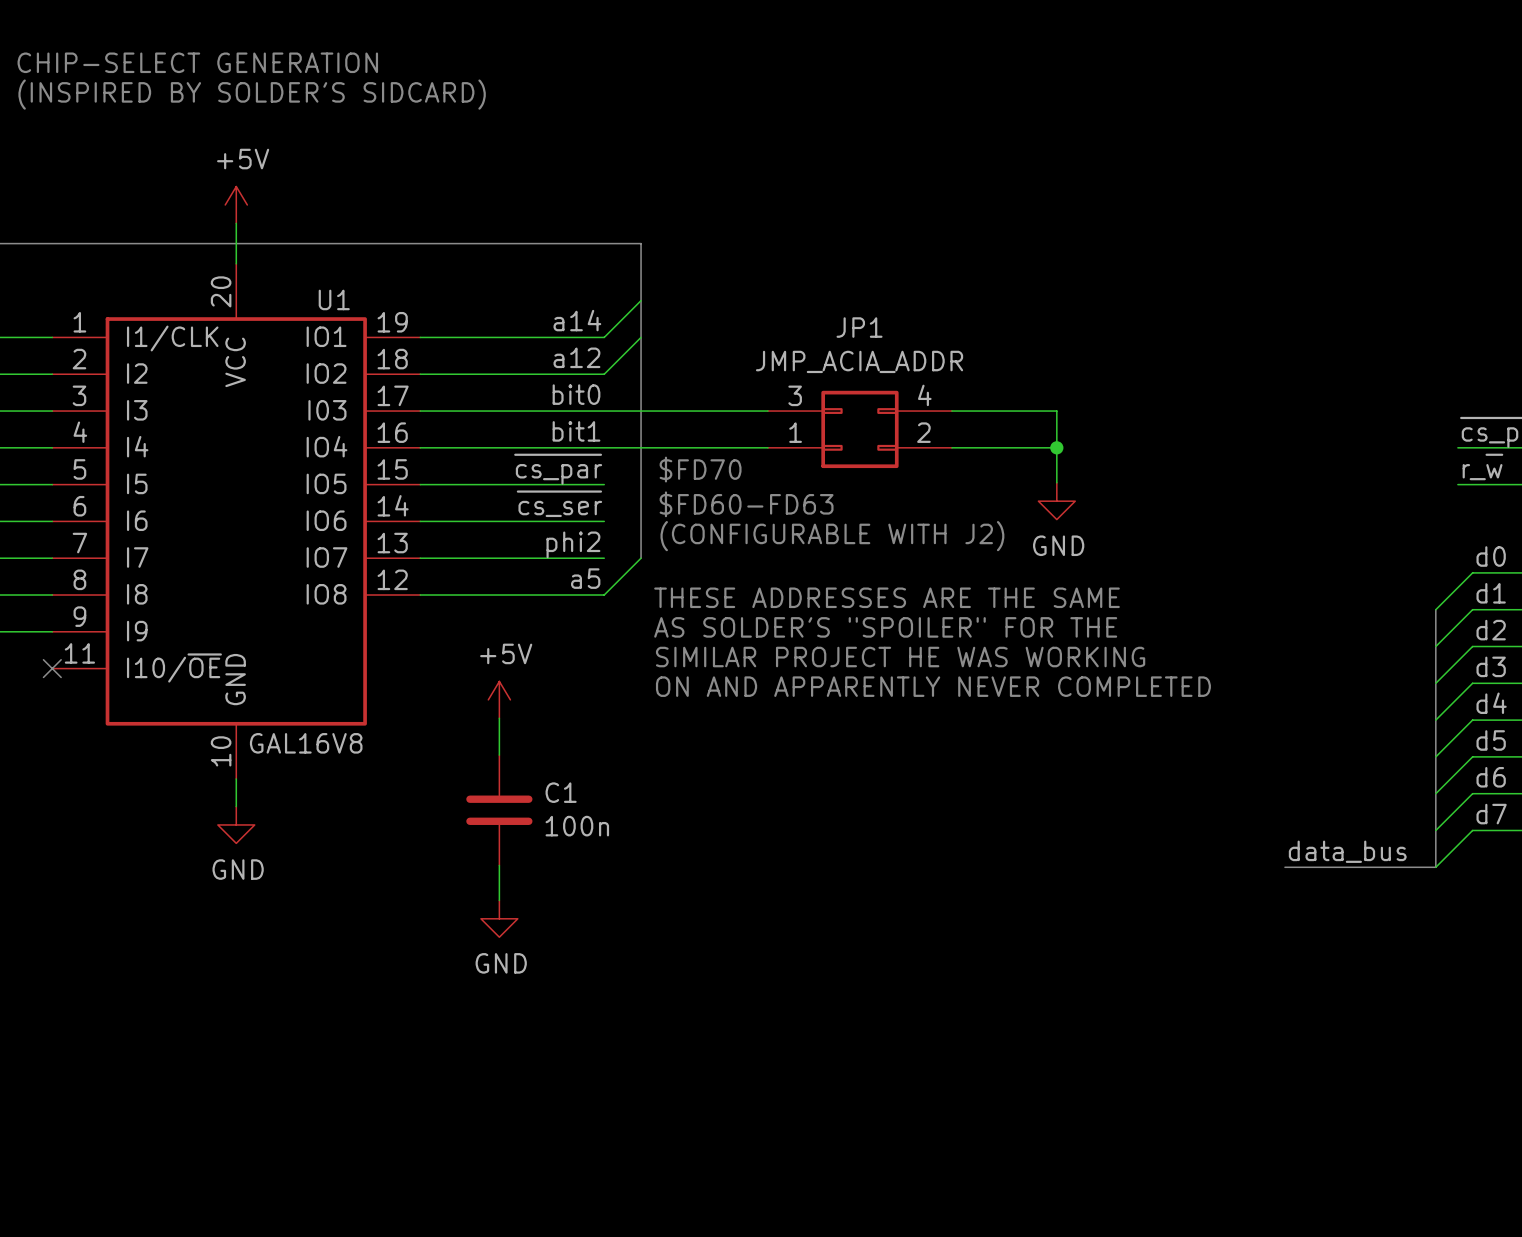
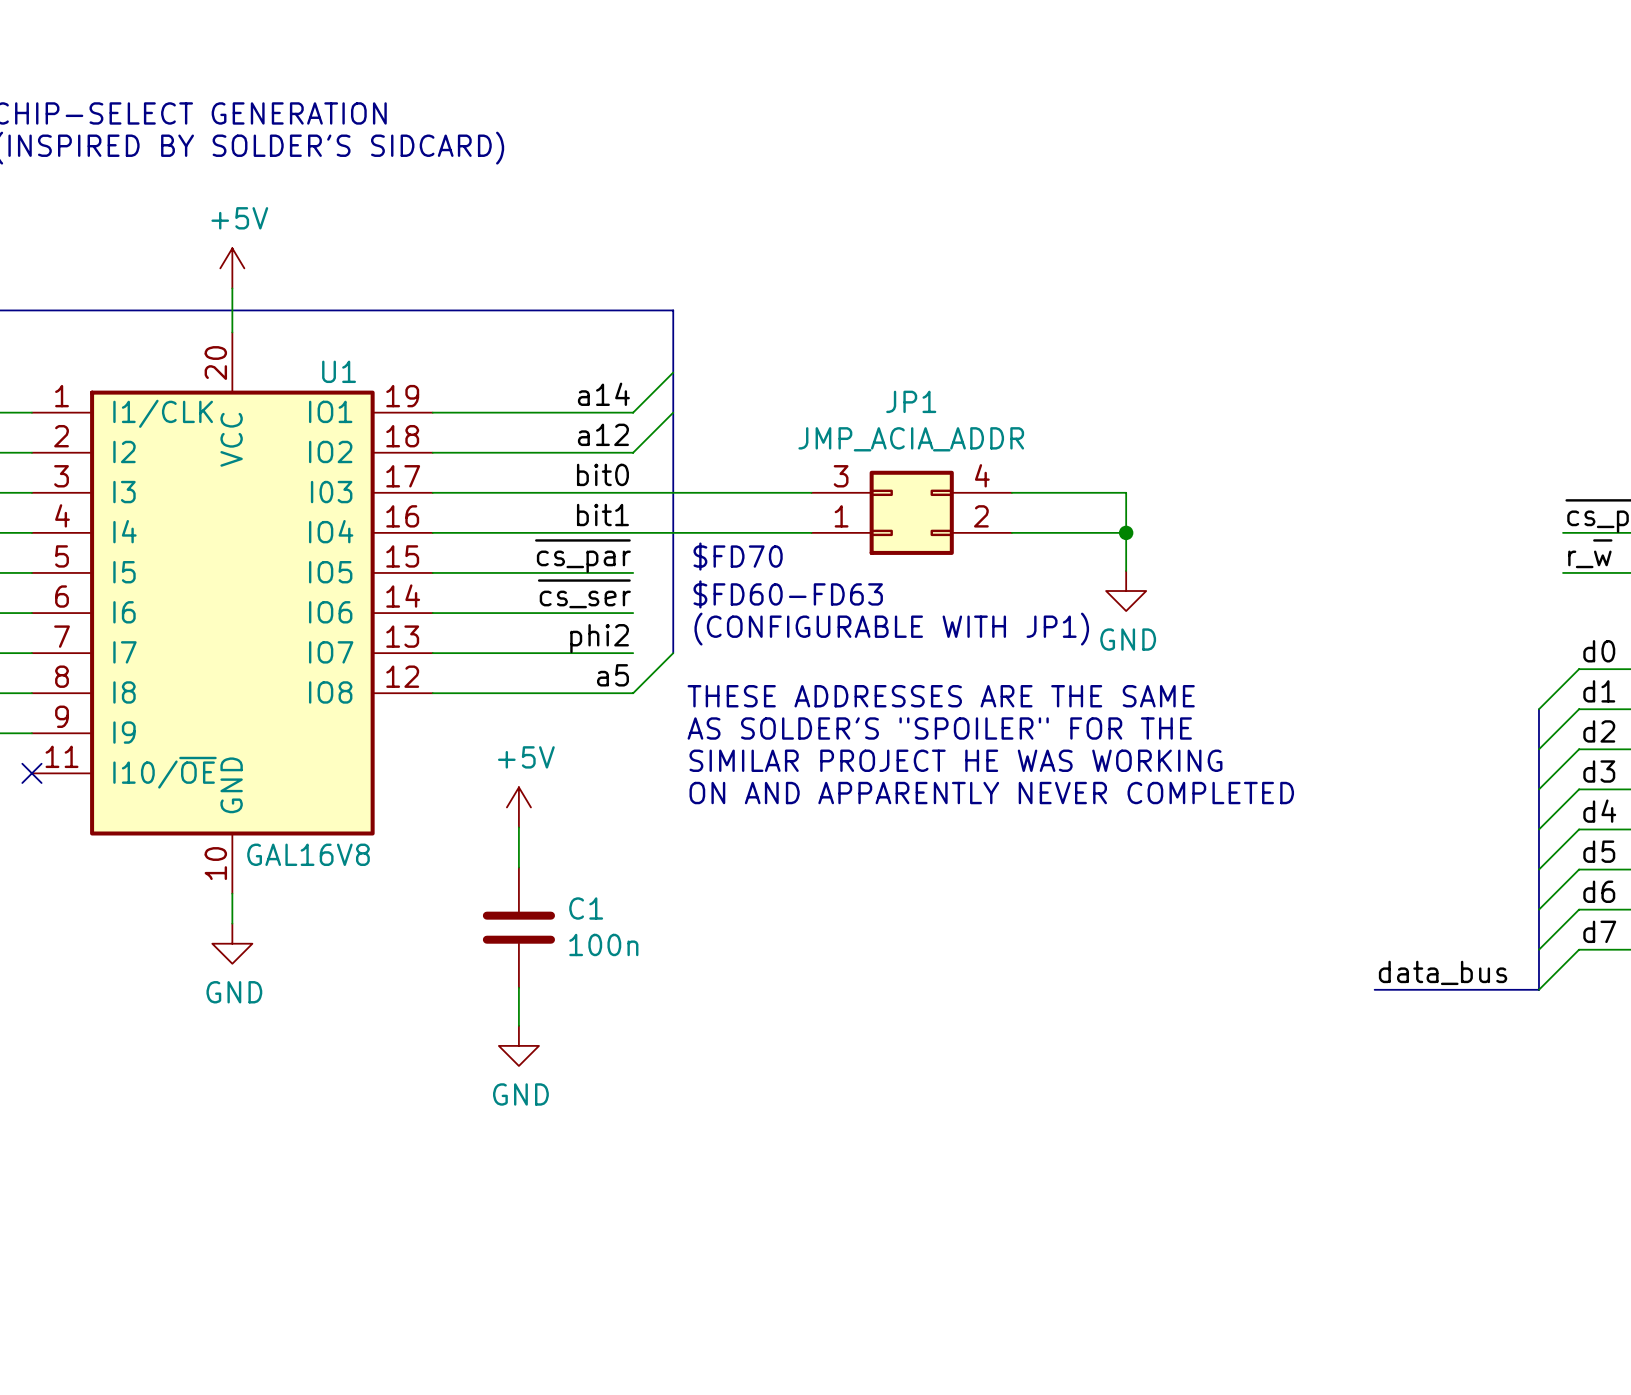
text: (CONFIGURABLE WITH J2) (832, 536) -> (CONFIGURABLE WITH JP1) (891, 629)

